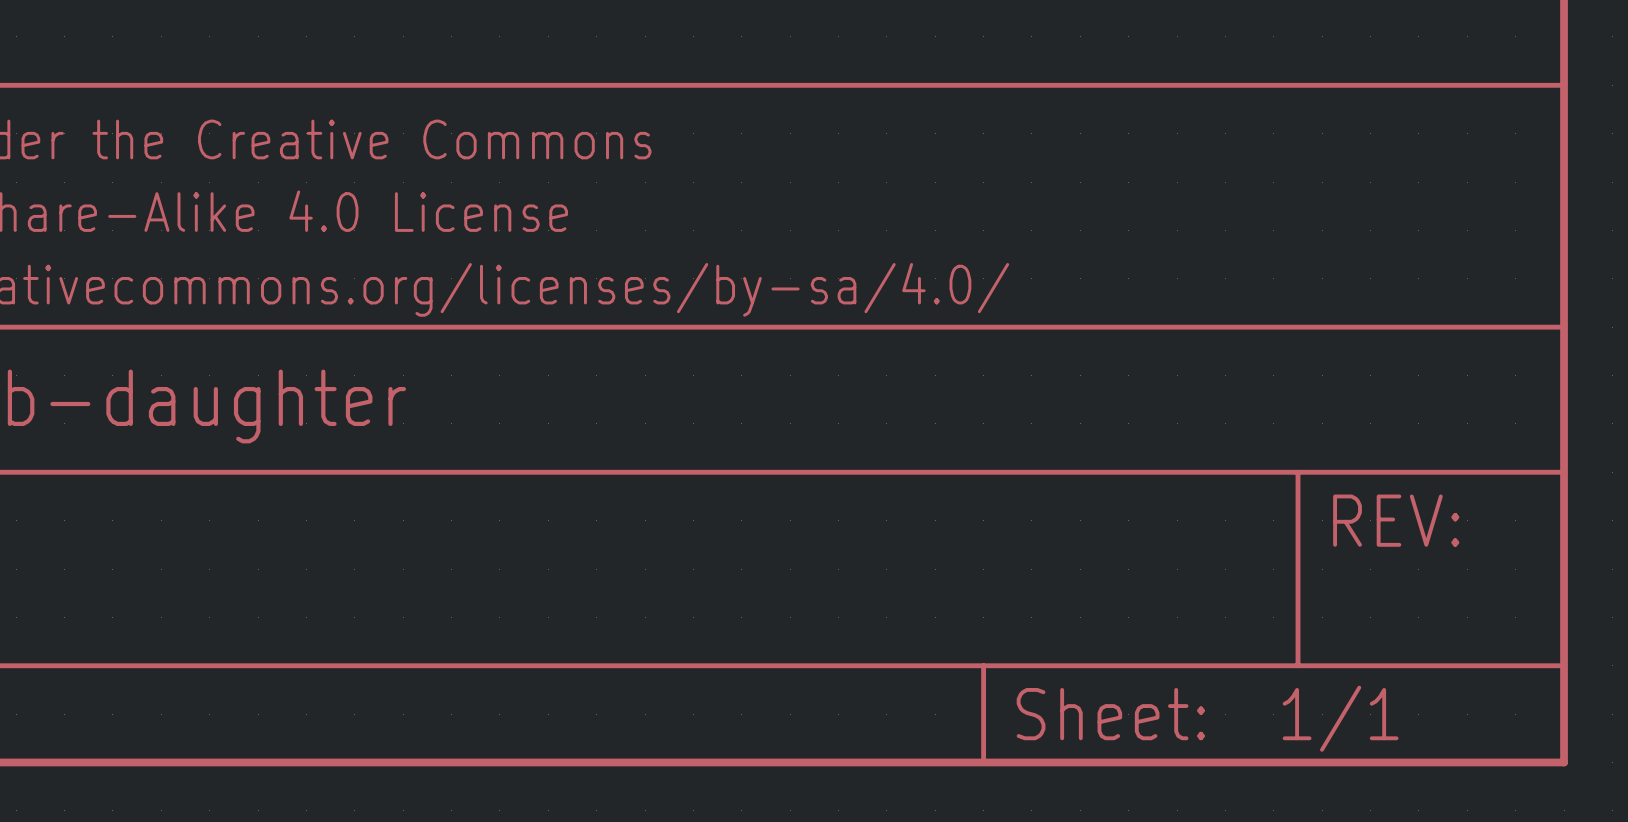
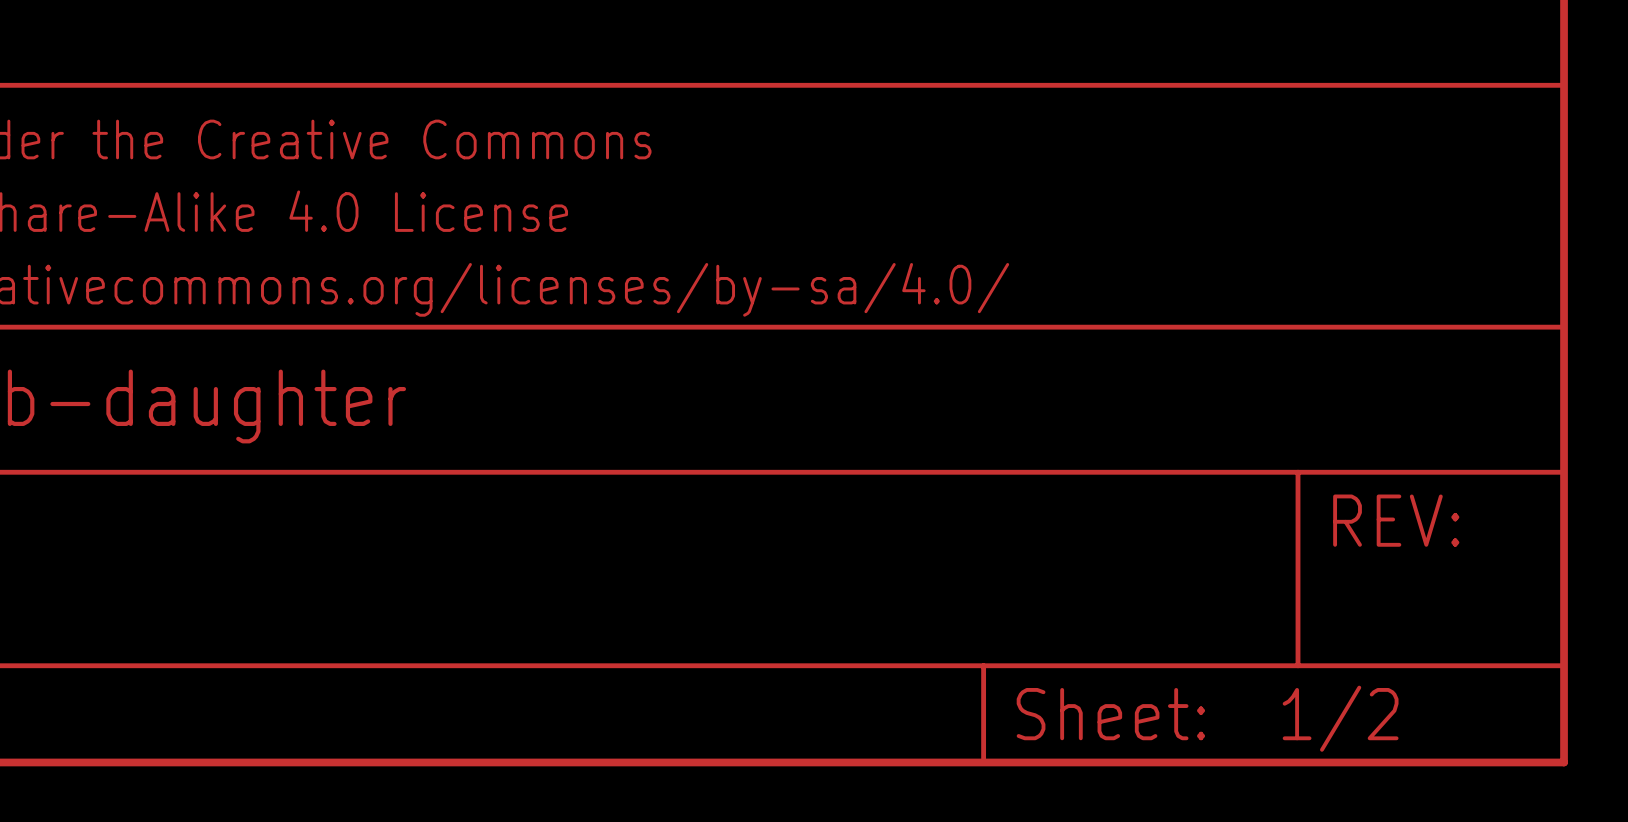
part text: 1/1 (1340, 718) -> 1/2 (1340, 718)

